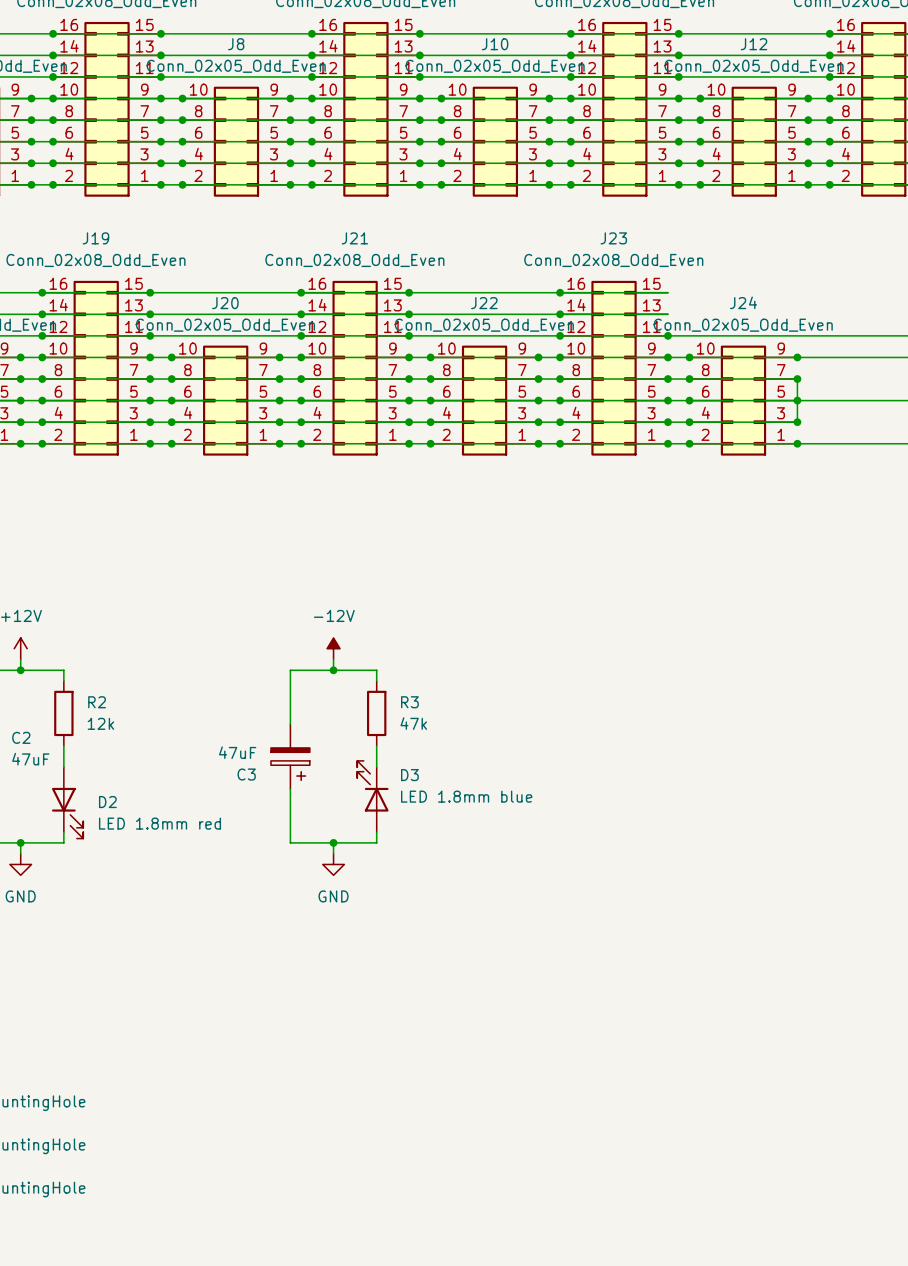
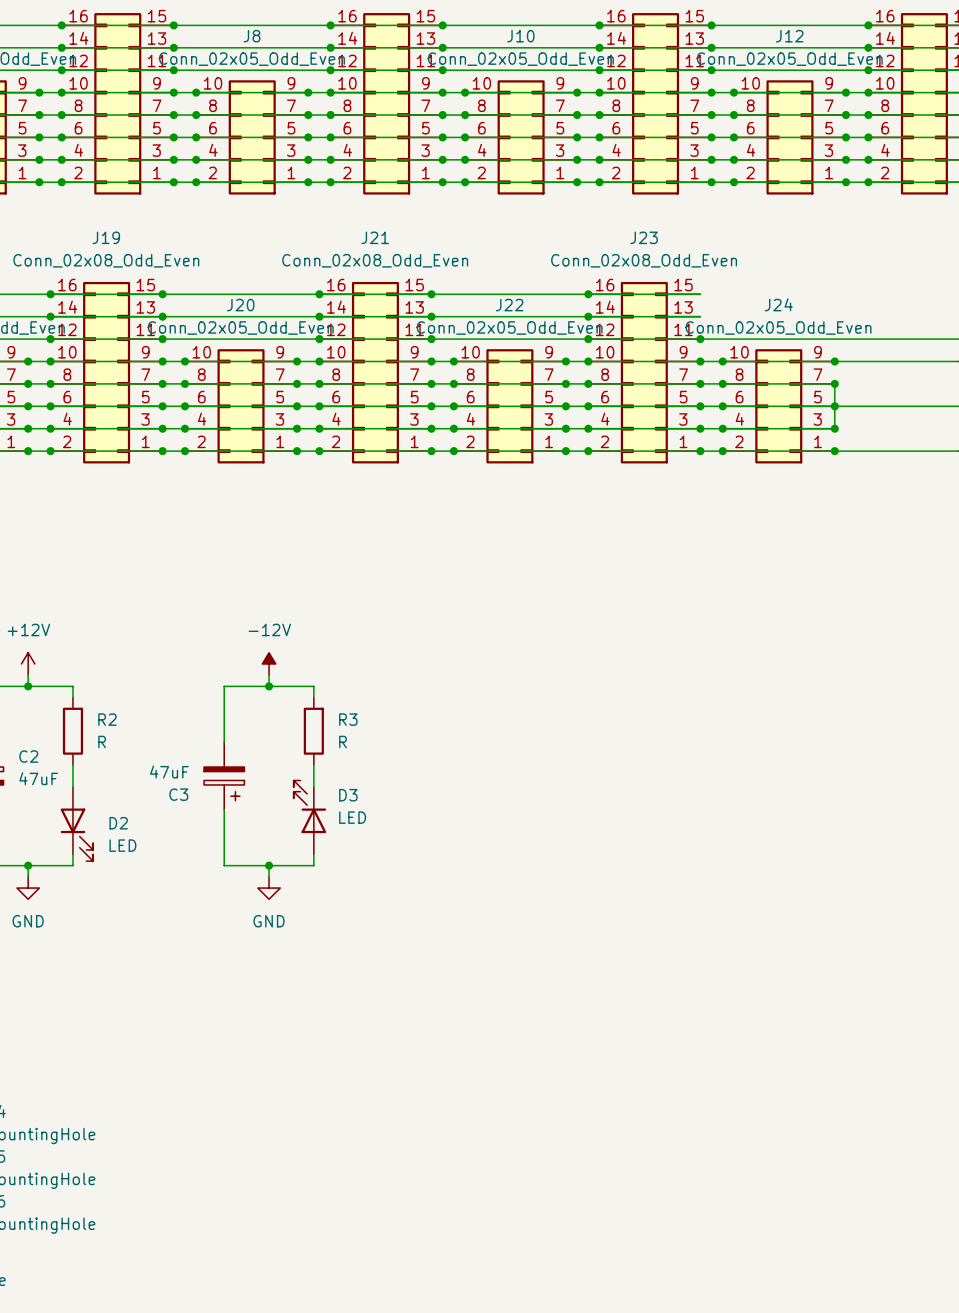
power symbol position: -12V (333, 648) -> -12V (269, 663)
wire: (333, 659) (333, 670) -> (269, 675) (269, 686)
junction: none -> (269, 686)
wire: (290, 670) (290, 724) -> (308, 686) (224, 686) (224, 742)
wire: (295, 670) (376, 670) (376, 681) -> (313, 686) (313, 697)
junction: (333, 670) -> none
R3 position: (376, 713) -> (313, 731)
R2 value: 12k (100, 723) -> R (102, 741)
R3 value: 47k (413, 723) -> R (343, 741)
wire: (376, 745) (376, 767) -> (313, 764) (313, 787)
C3 position: (290, 756) -> (224, 776)
wire: (290, 788) (290, 842) -> (224, 809) (224, 865) (308, 865)
D3 position: (372, 796) -> (309, 817)
D3 value: LED 1.8mm blue (466, 796) -> LED (352, 817)
D2 value: LED 1.8mm red (160, 823) -> LED (122, 845)
wire: (376, 832) (376, 842) (295, 842) -> (313, 854) (313, 865)
junction: none -> (269, 865)
wire: (333, 842) (333, 853) -> (269, 865) (269, 876)
junction: (333, 842) -> none
power symbol position: GND (333, 864) -> GND (269, 888)

